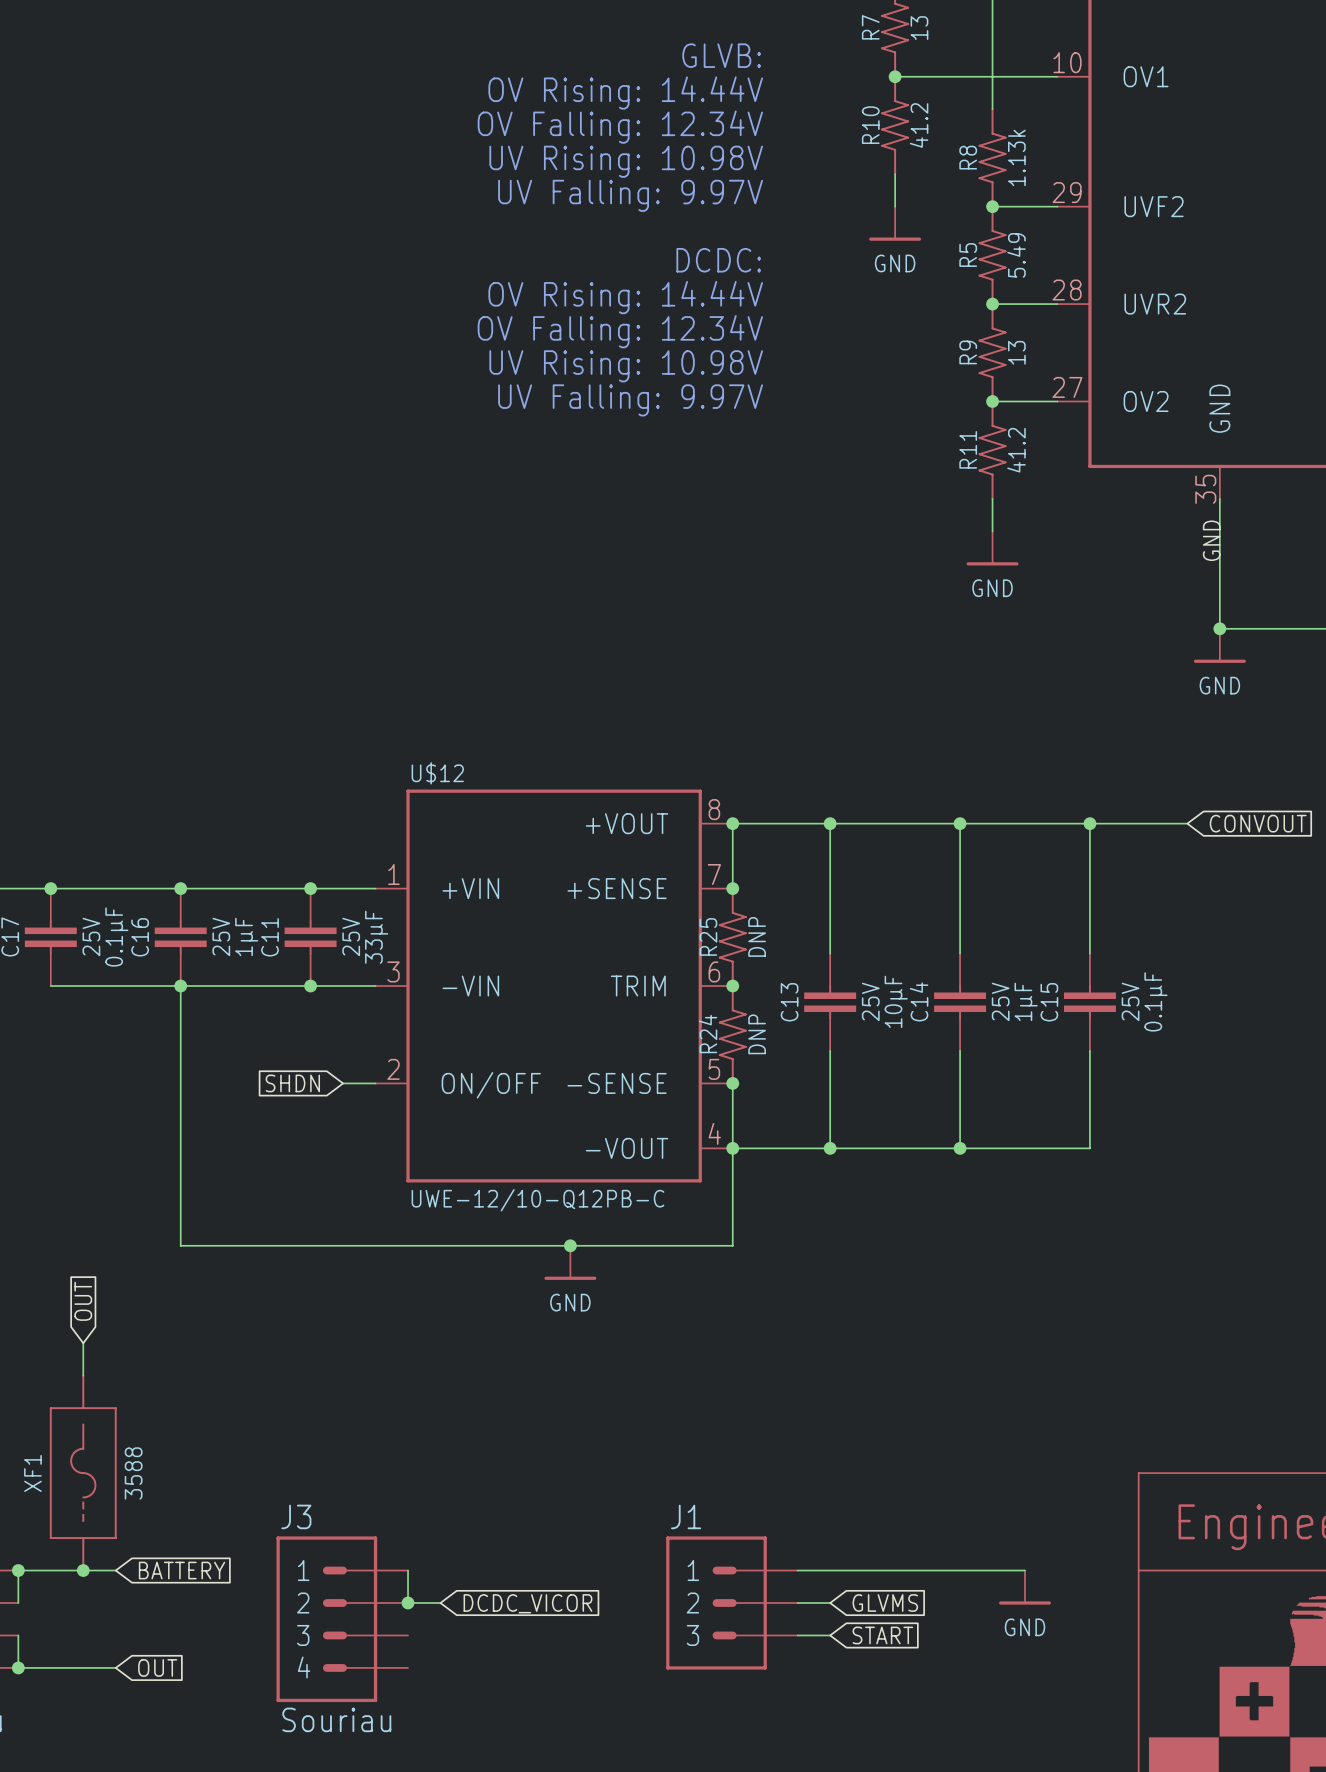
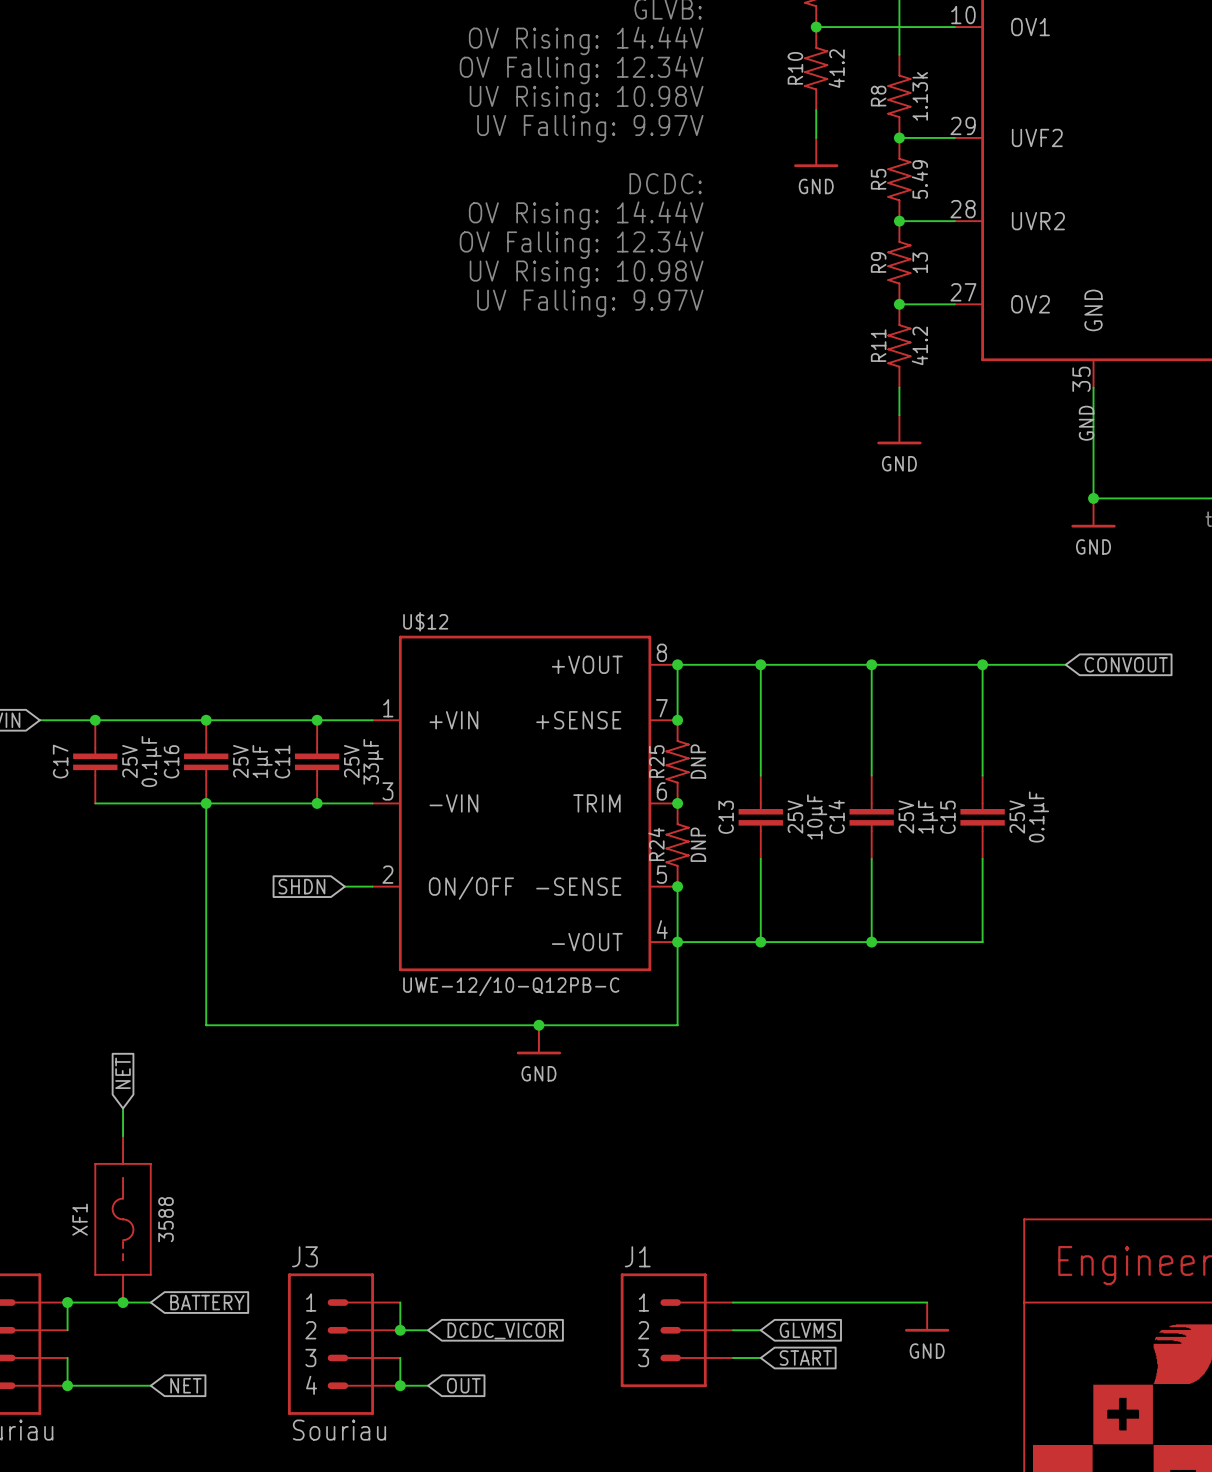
global label: OUT (83, 1301) -> NET (123, 1073)
wire: none -> (400, 1358) (400, 1385) (428, 1385)
global label: OUT (157, 1667) -> NET (185, 1385)
junction: none -> (400, 1385)
global label: none -> OUT (463, 1385)

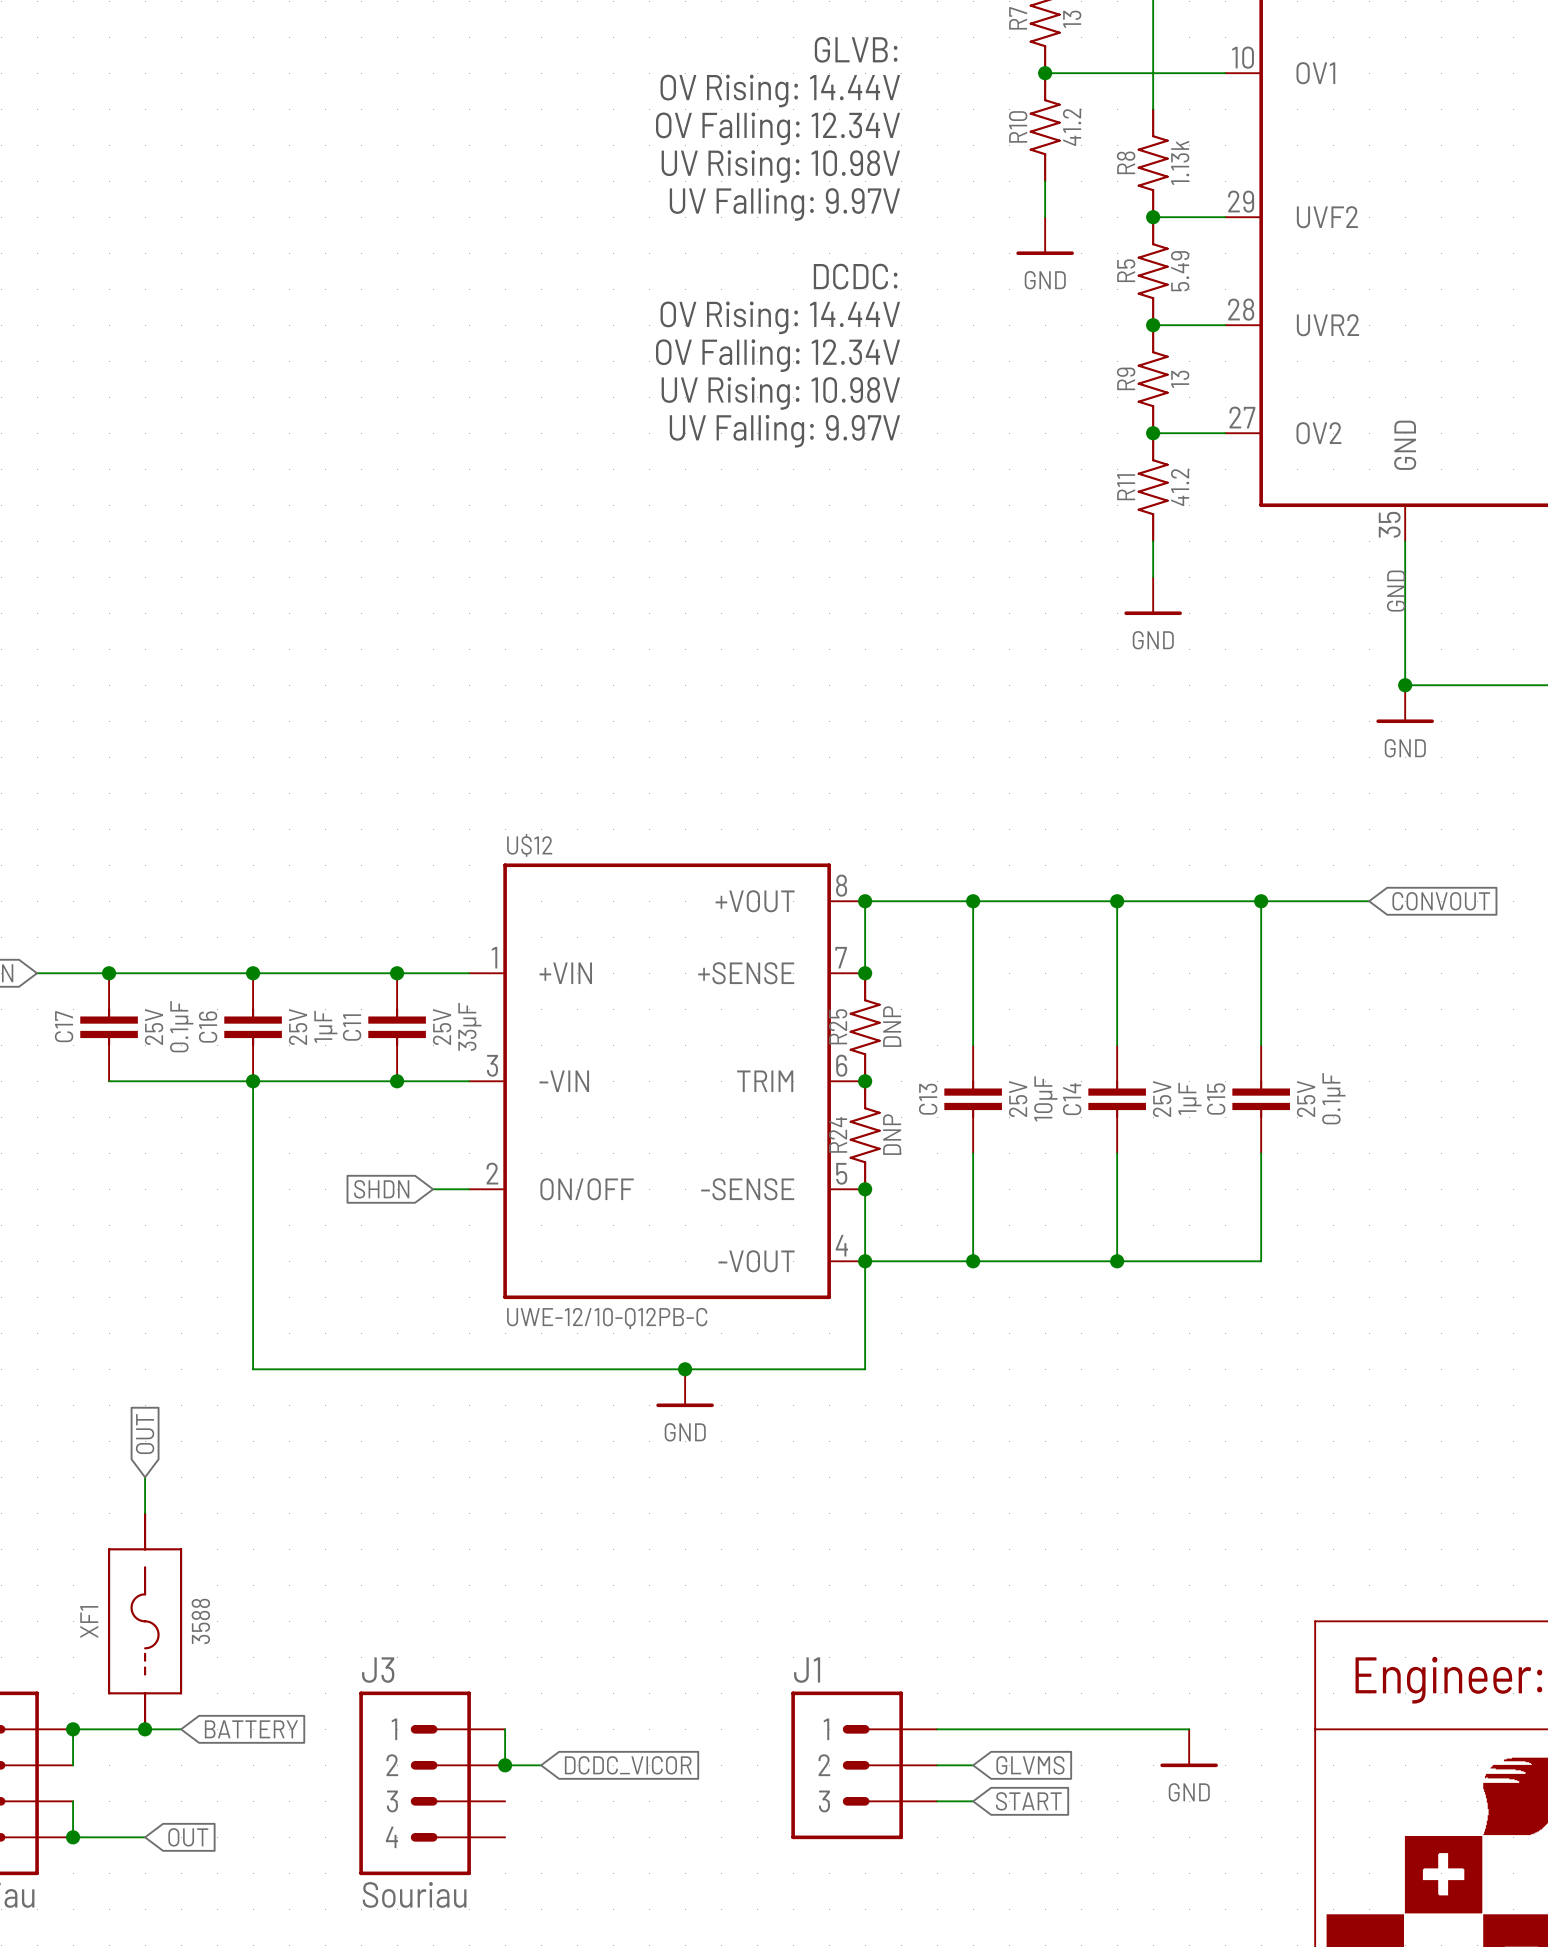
global label: NET (123, 1073) -> OUT (145, 1434)
wire: (400, 1358) (400, 1385) (428, 1385) -> none
wire: (123, 1385) (150, 1385) -> none
global label: none -> OUT (188, 1837)
global label: NET (185, 1385) -> none
junction: (400, 1385) -> none
global label: OUT (463, 1385) -> none

